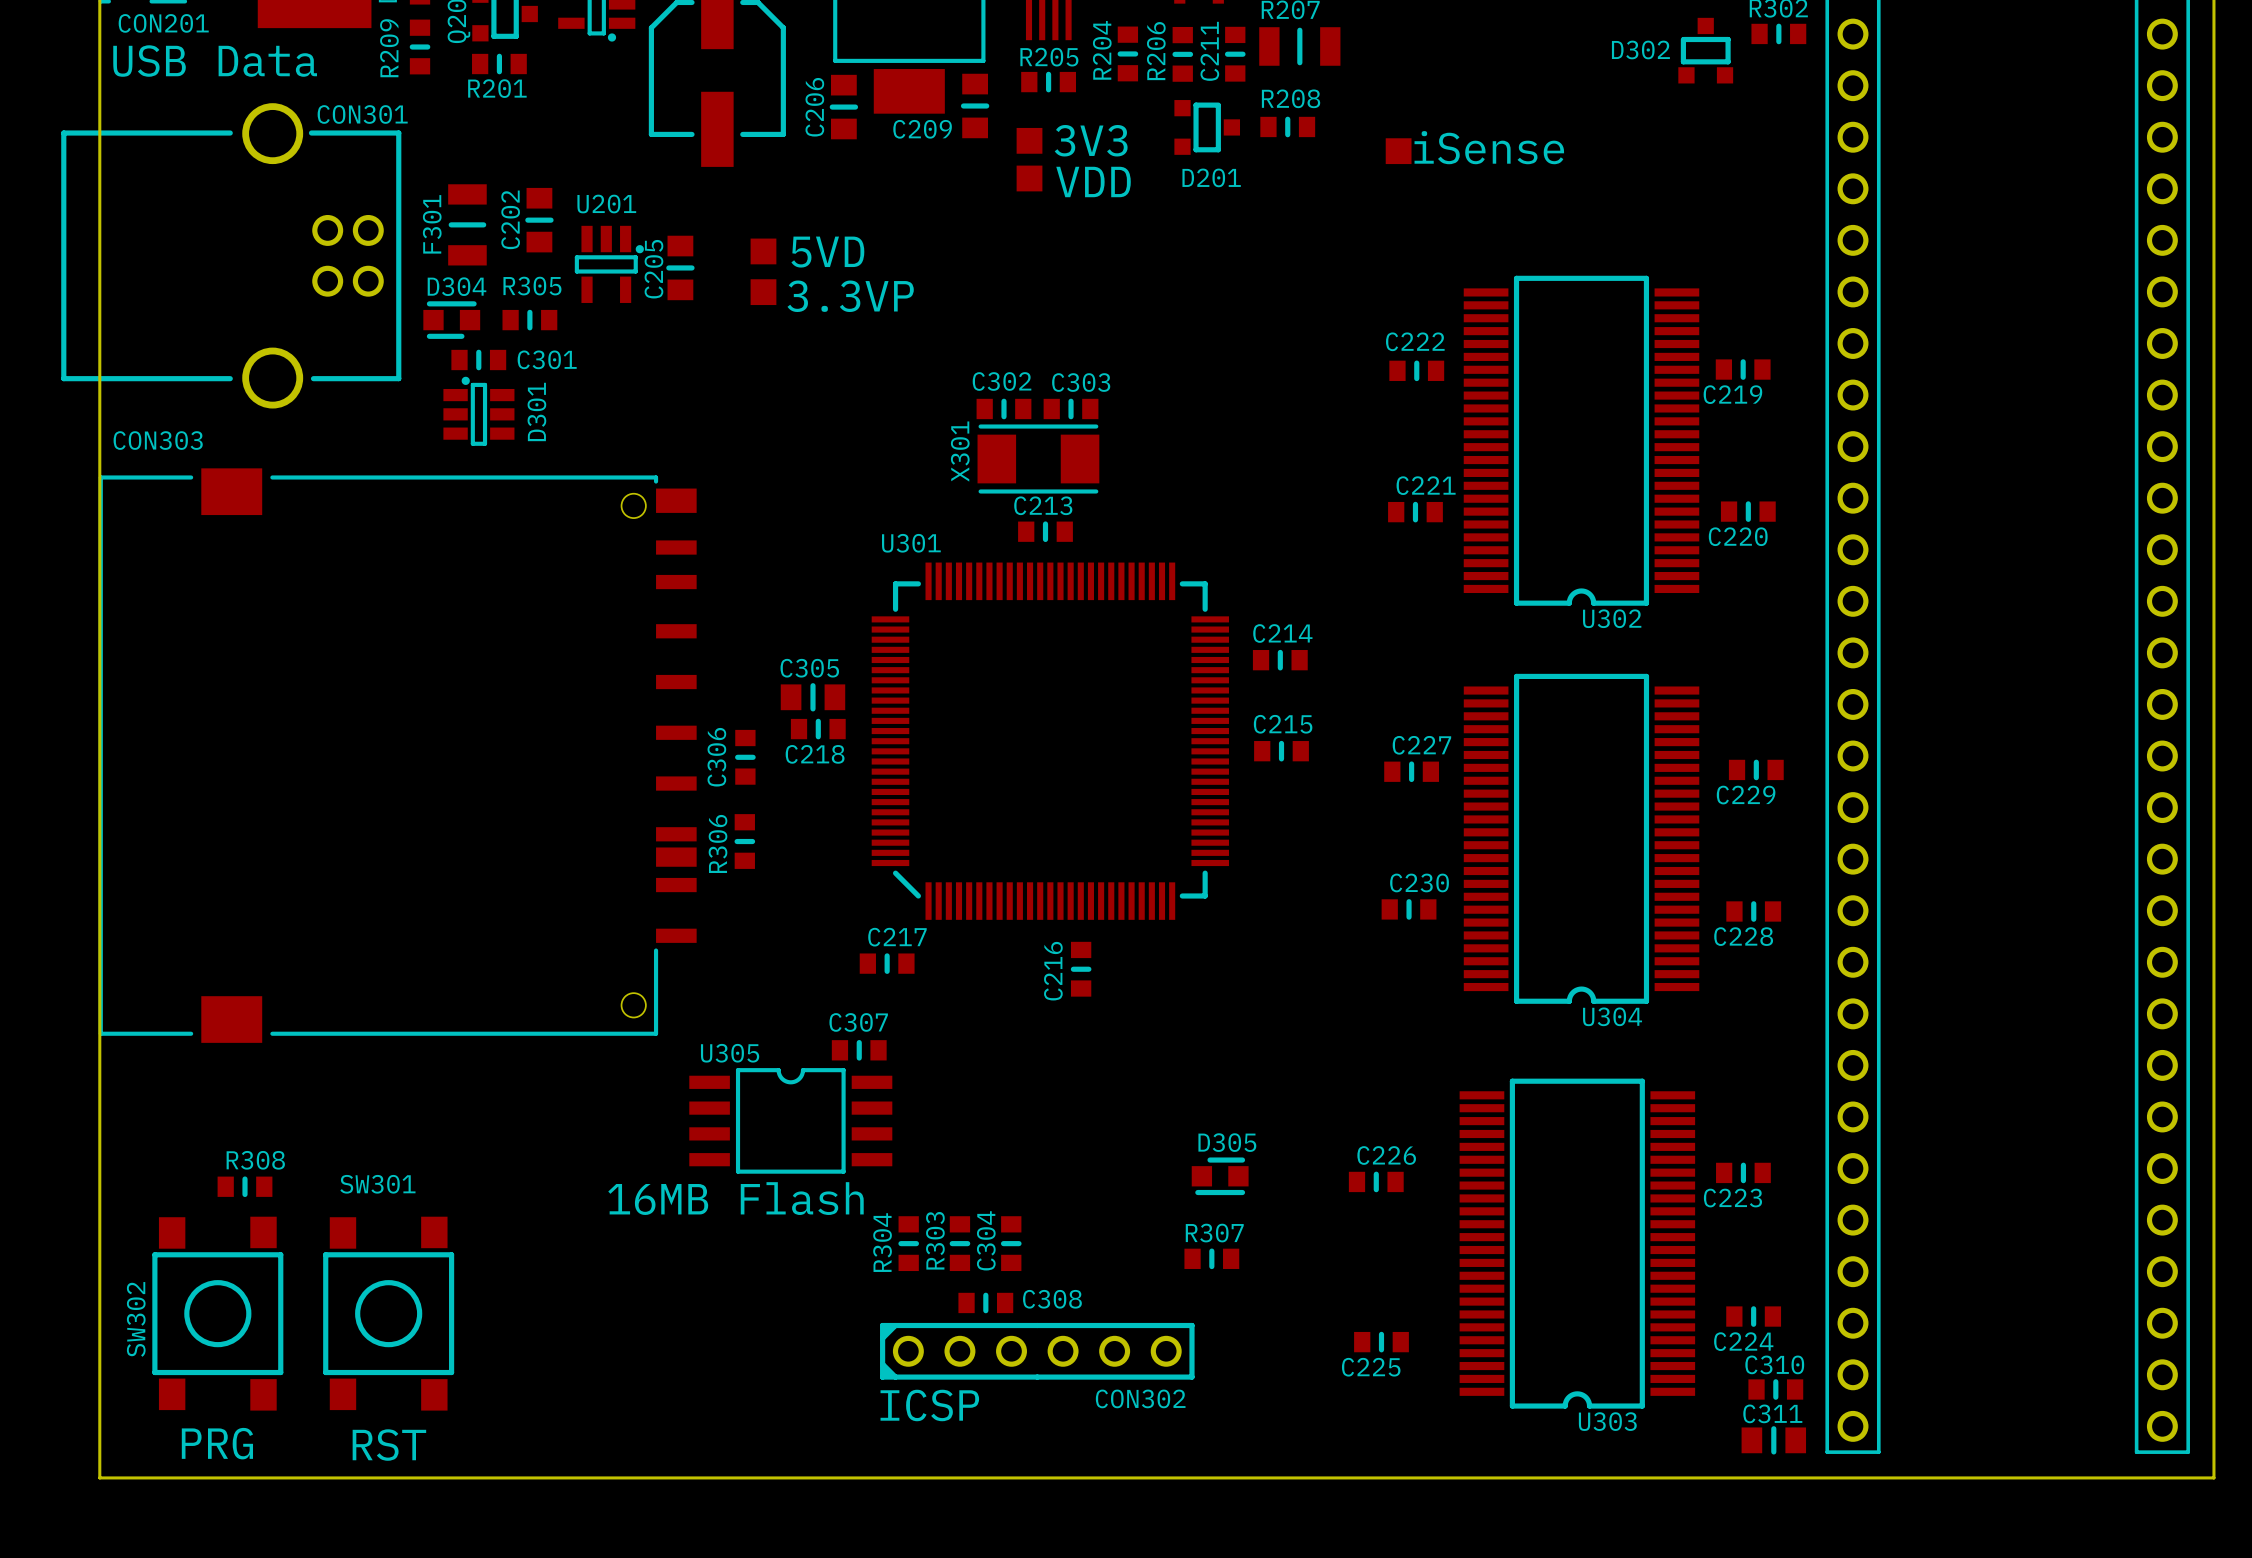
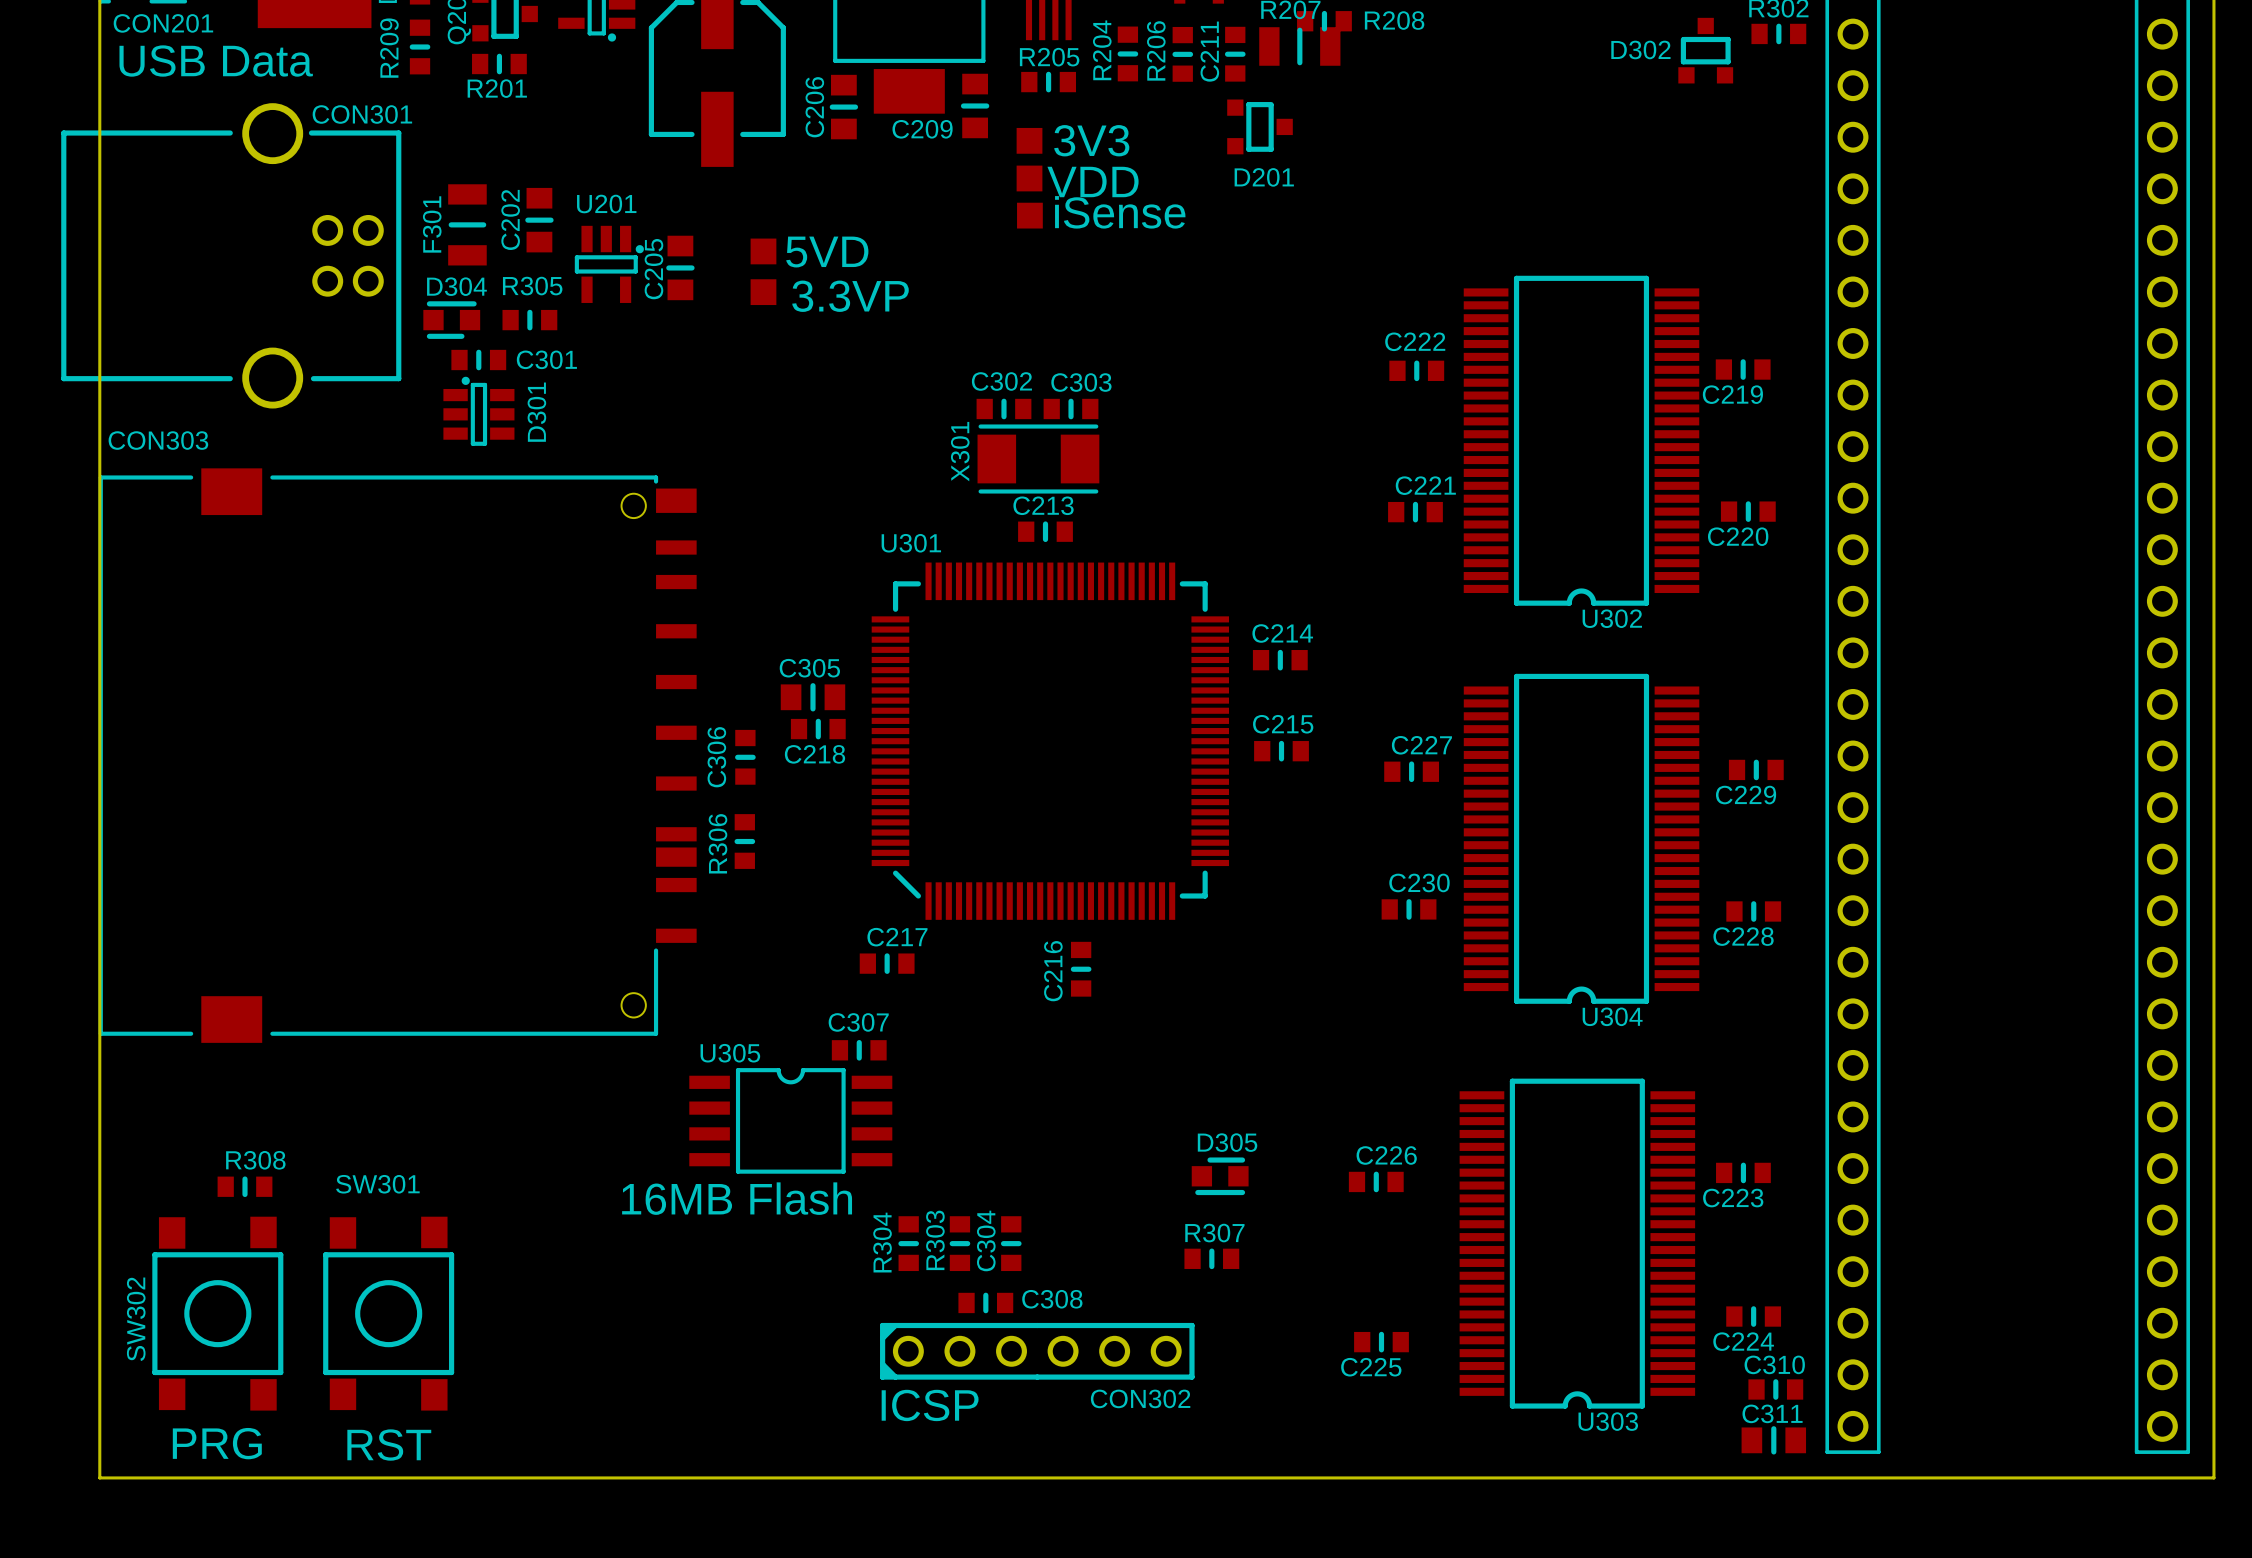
R208 name position: R208 (1291, 98) -> R208 (1394, 20)
R208 position: (1287, 126) -> (1324, 21)
D201 position: (1207, 127) -> (1260, 126)
text position: iSense (1489, 147) -> iSense (1120, 212)
part position: (1398, 151) -> (1029, 215)

